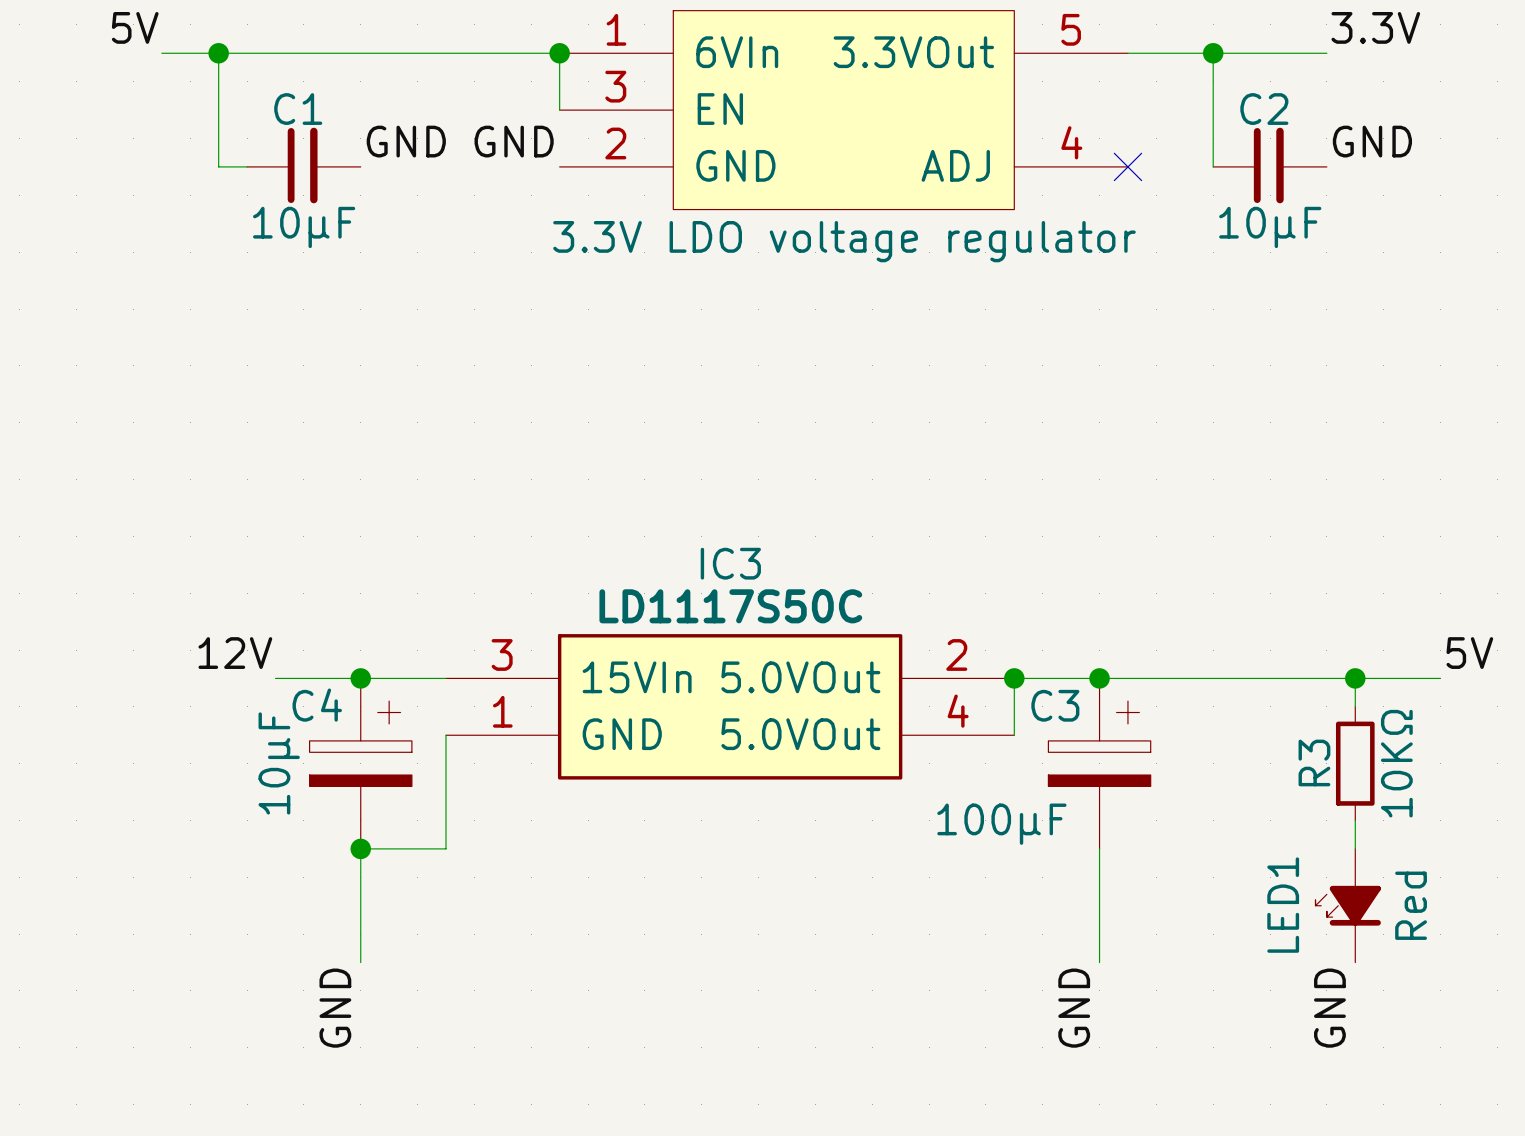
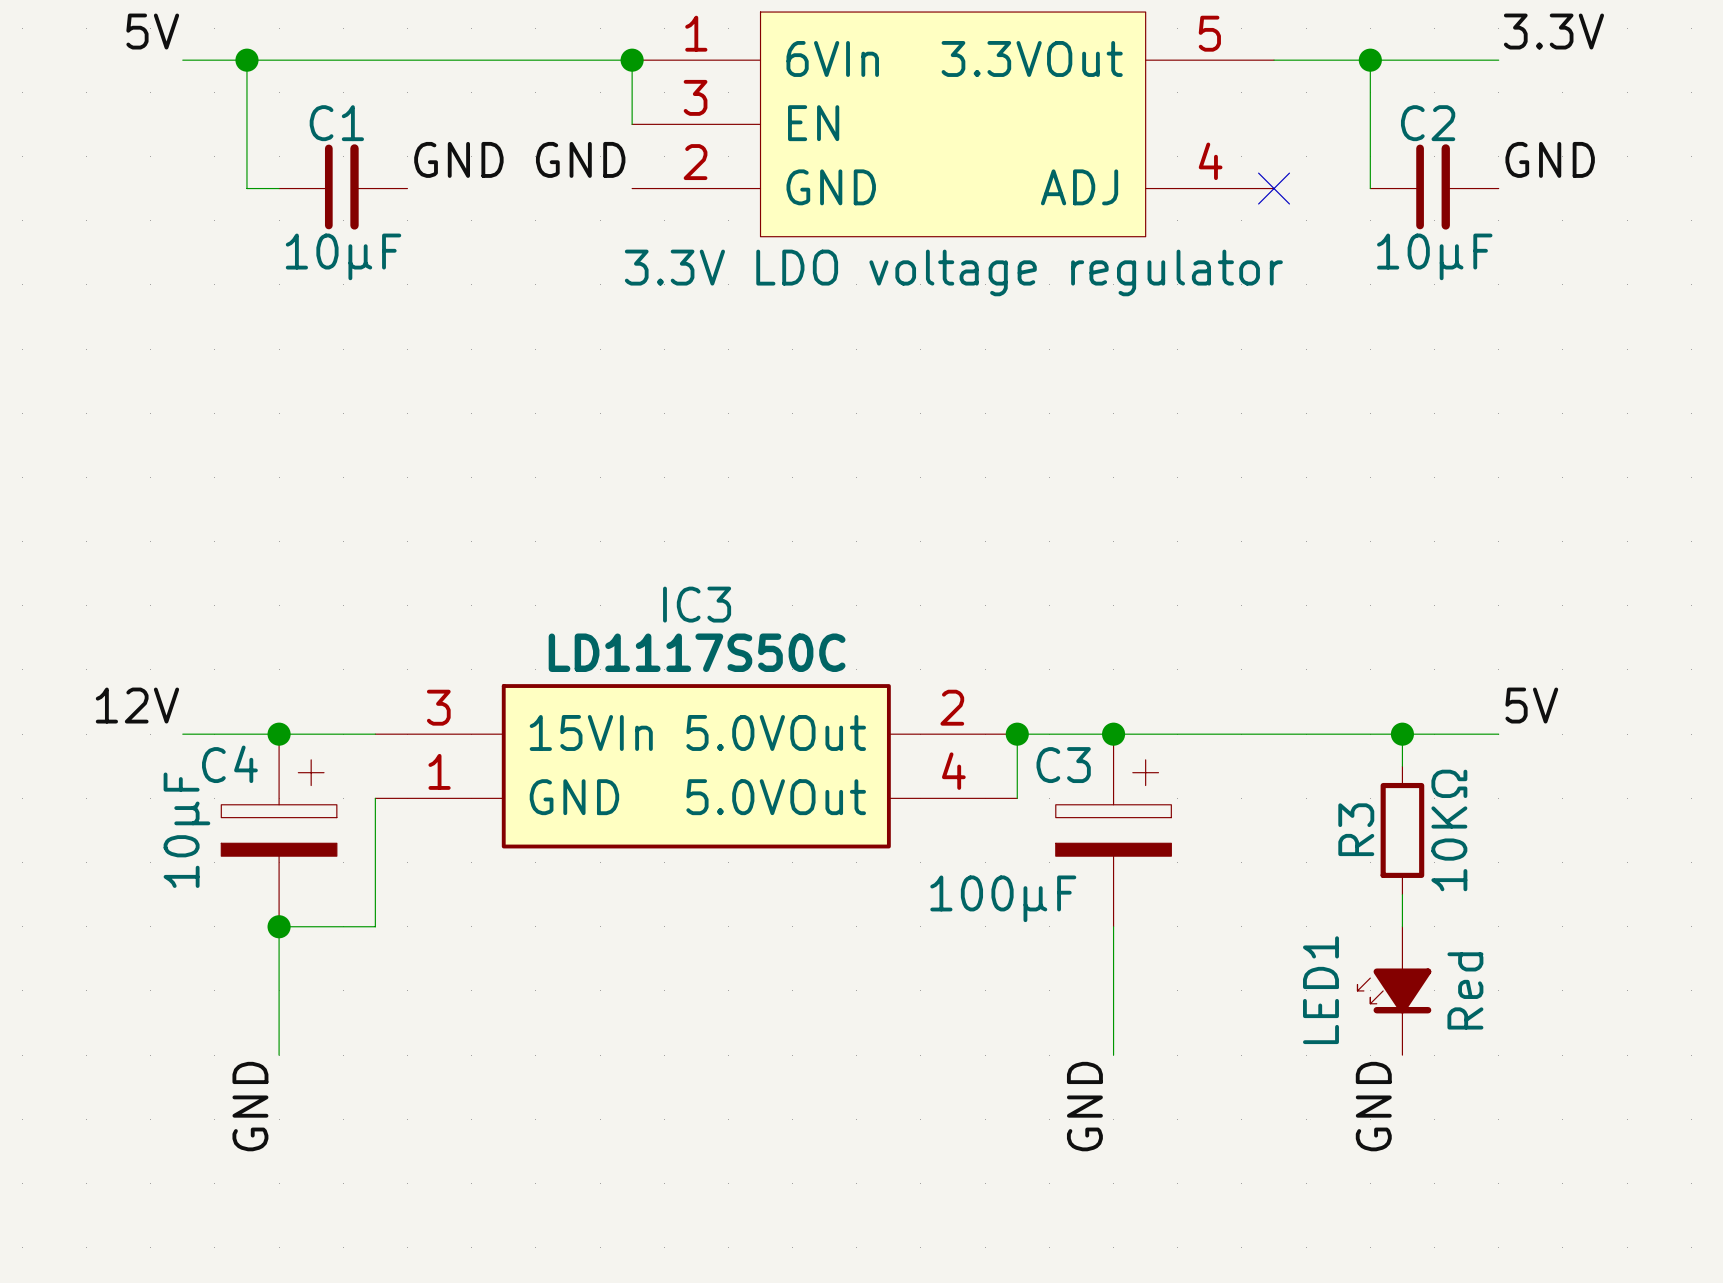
junction: none -> (279, 734)
junction: none -> (1017, 734)
junction: none -> (1402, 734)
label position: 12V (235, 653) -> 12V (137, 705)
label position: 5V (1469, 653) -> 5V (1531, 705)
wire: (275, 678) (445, 678) -> (182, 734) (375, 734)
junction: (360, 678) -> none
junction position: (1014, 678) -> (1113, 734)
junction: (1099, 678) -> none
wire: (1355, 678) (1355, 706) -> (1402, 734) (1402, 766)
junction: (1355, 678) -> none
wire: (1440, 678) (1014, 678) (1014, 735) -> (1498, 734) (1017, 734) (1017, 798)
IC3 position: (730, 706) -> (696, 766)
wire: (445, 735) (445, 848) (360, 848) (360, 962) -> (375, 798) (375, 926) (279, 926) (279, 1055)
C4 position: (360, 763) -> (279, 830)
C3 position: (1099, 763) -> (1113, 830)
R3 position: (1355, 763) -> (1402, 830)
junction: none -> (279, 926)
wire: (1355, 820) (1355, 848) -> (1402, 894) (1402, 926)
junction: (360, 848) -> none
wire: (1099, 848) (1099, 962) -> (1113, 926) (1113, 1055)
LED1 position: (1348, 905) -> (1394, 990)
label: none -> GND (1084, 1106)
label: none -> GND (1373, 1106)
label position: GND (335, 1008) -> GND (250, 1106)
label: GND (1074, 1008) -> none
label: GND (1329, 1008) -> none

